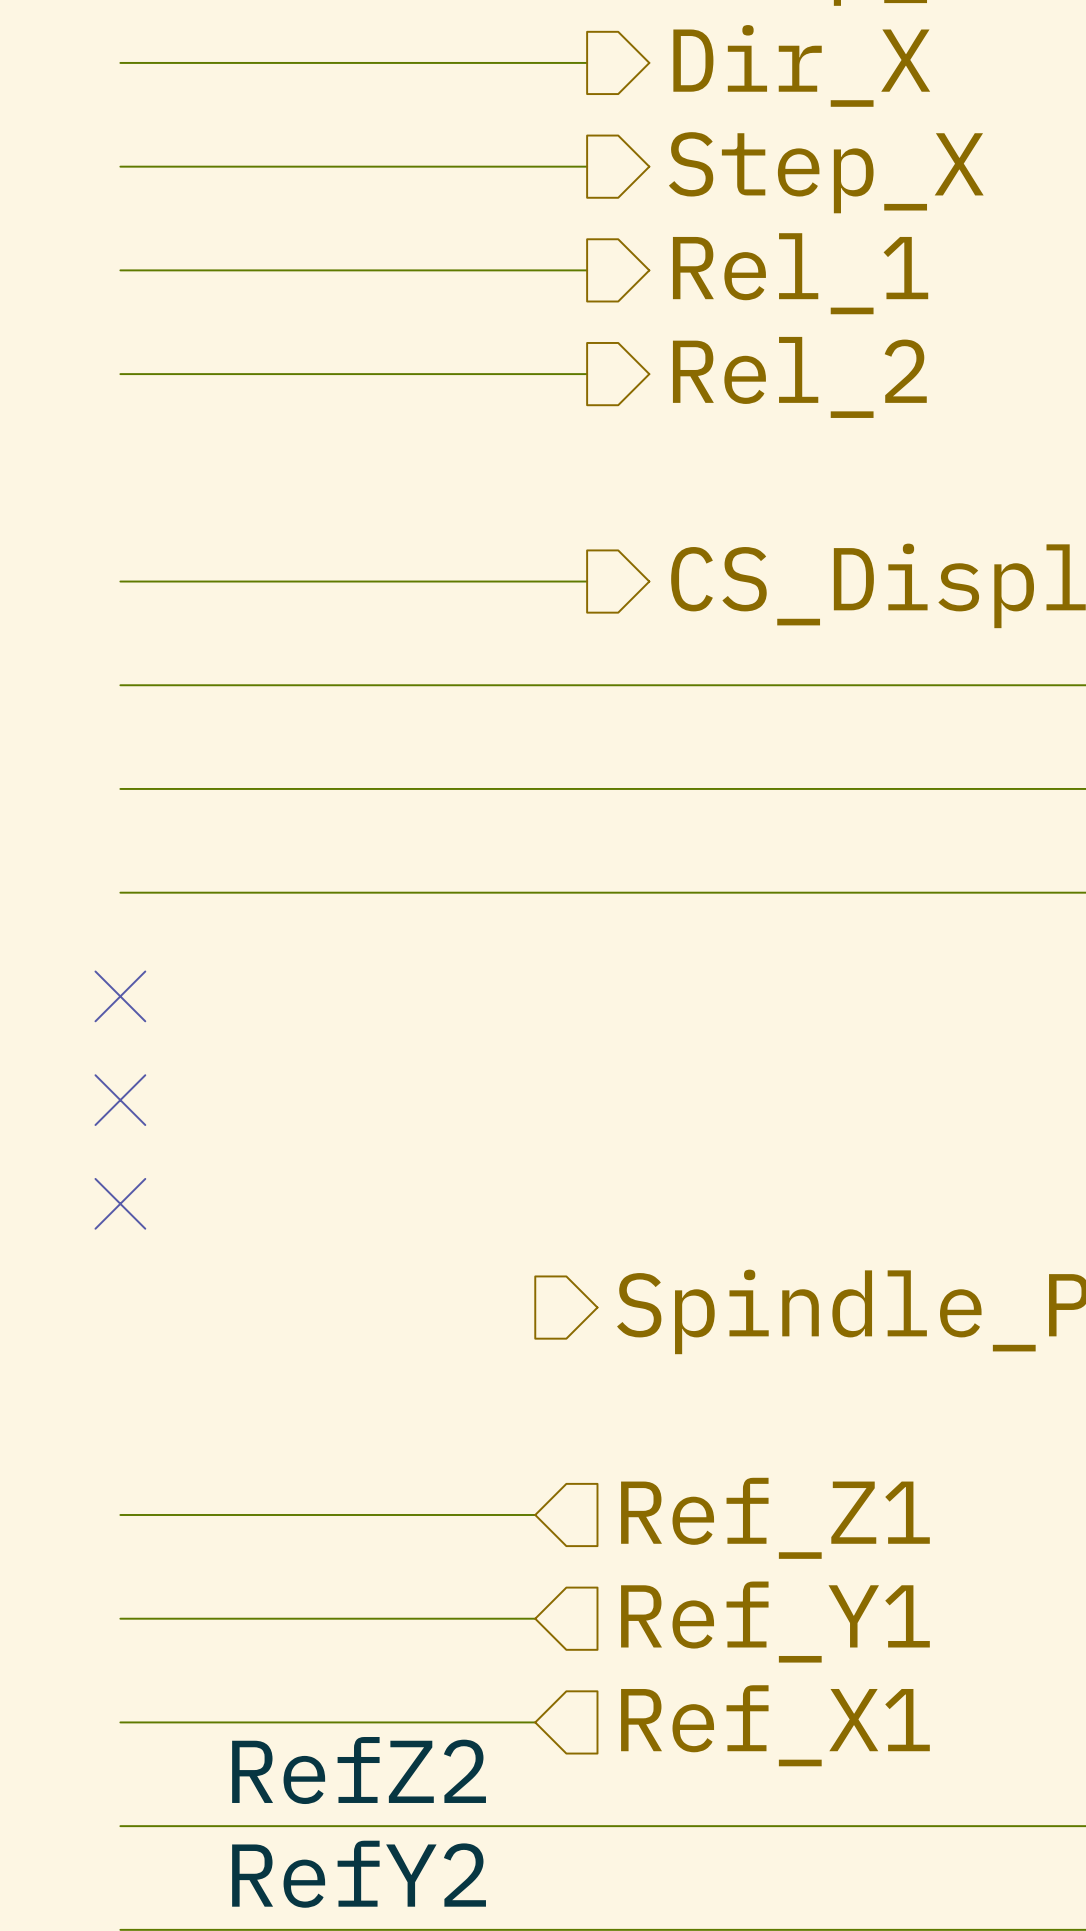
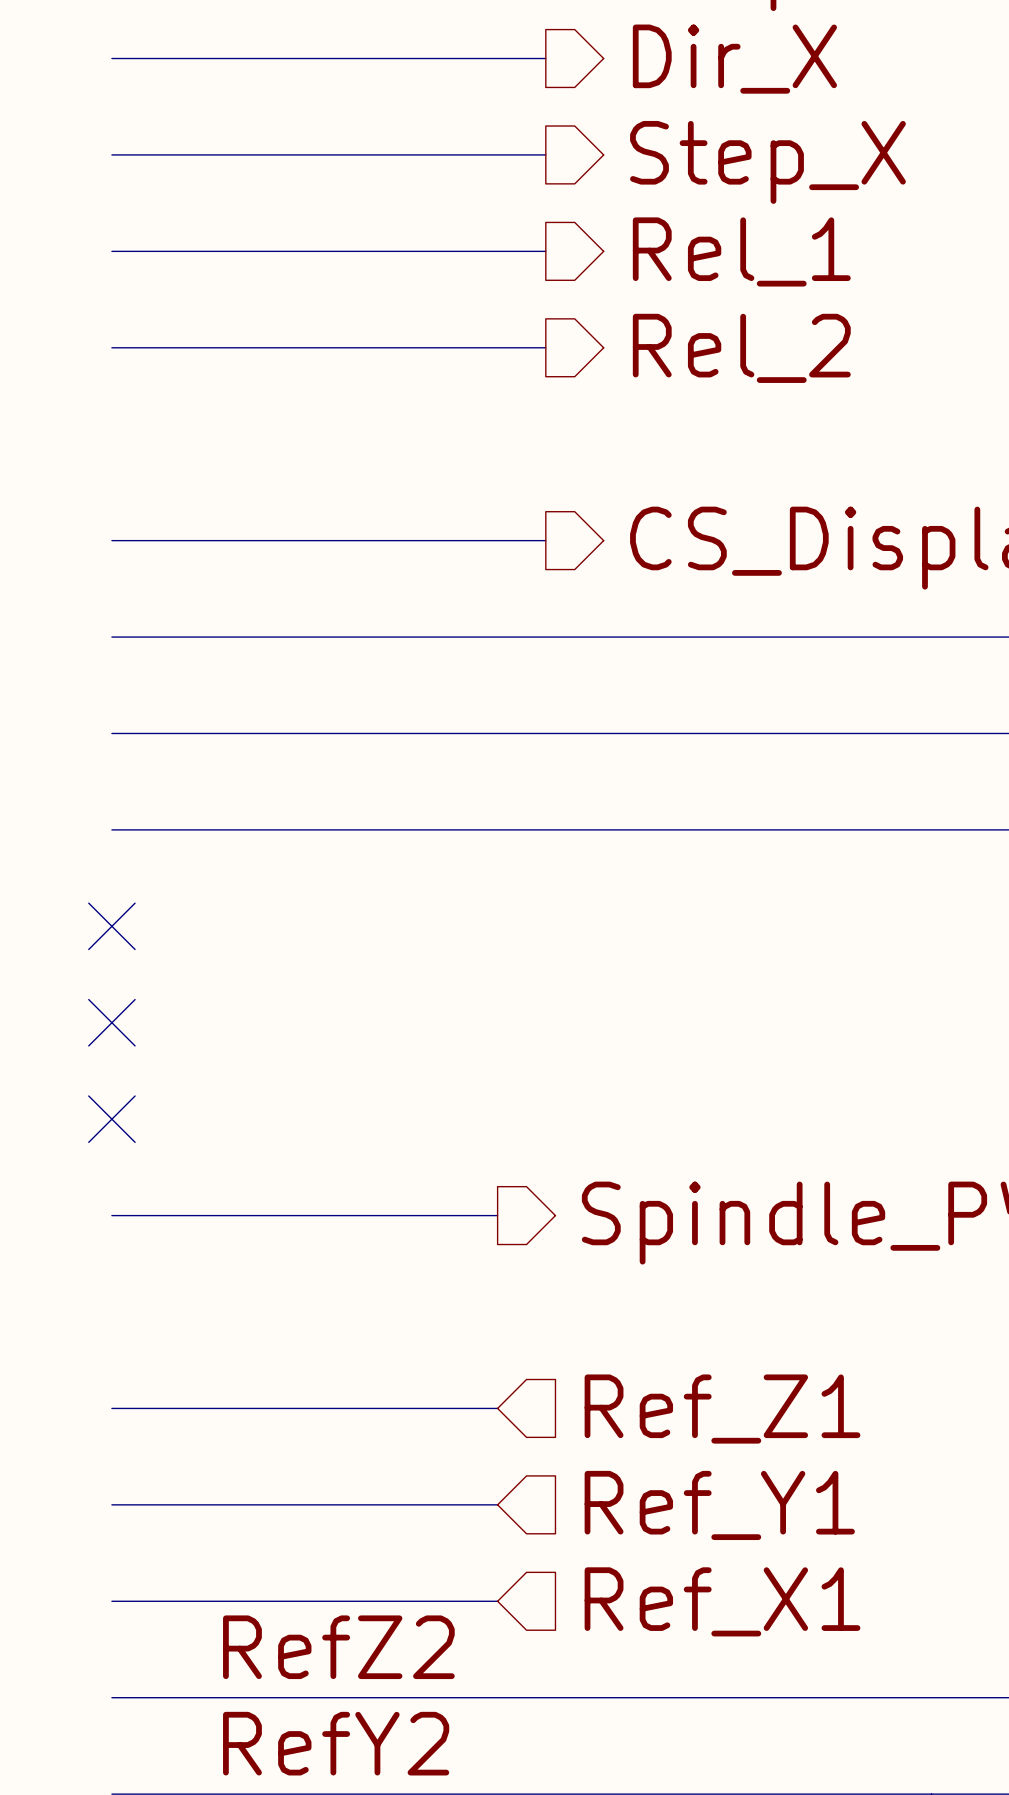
wire: none -> (111, 1215) (497, 1215)

